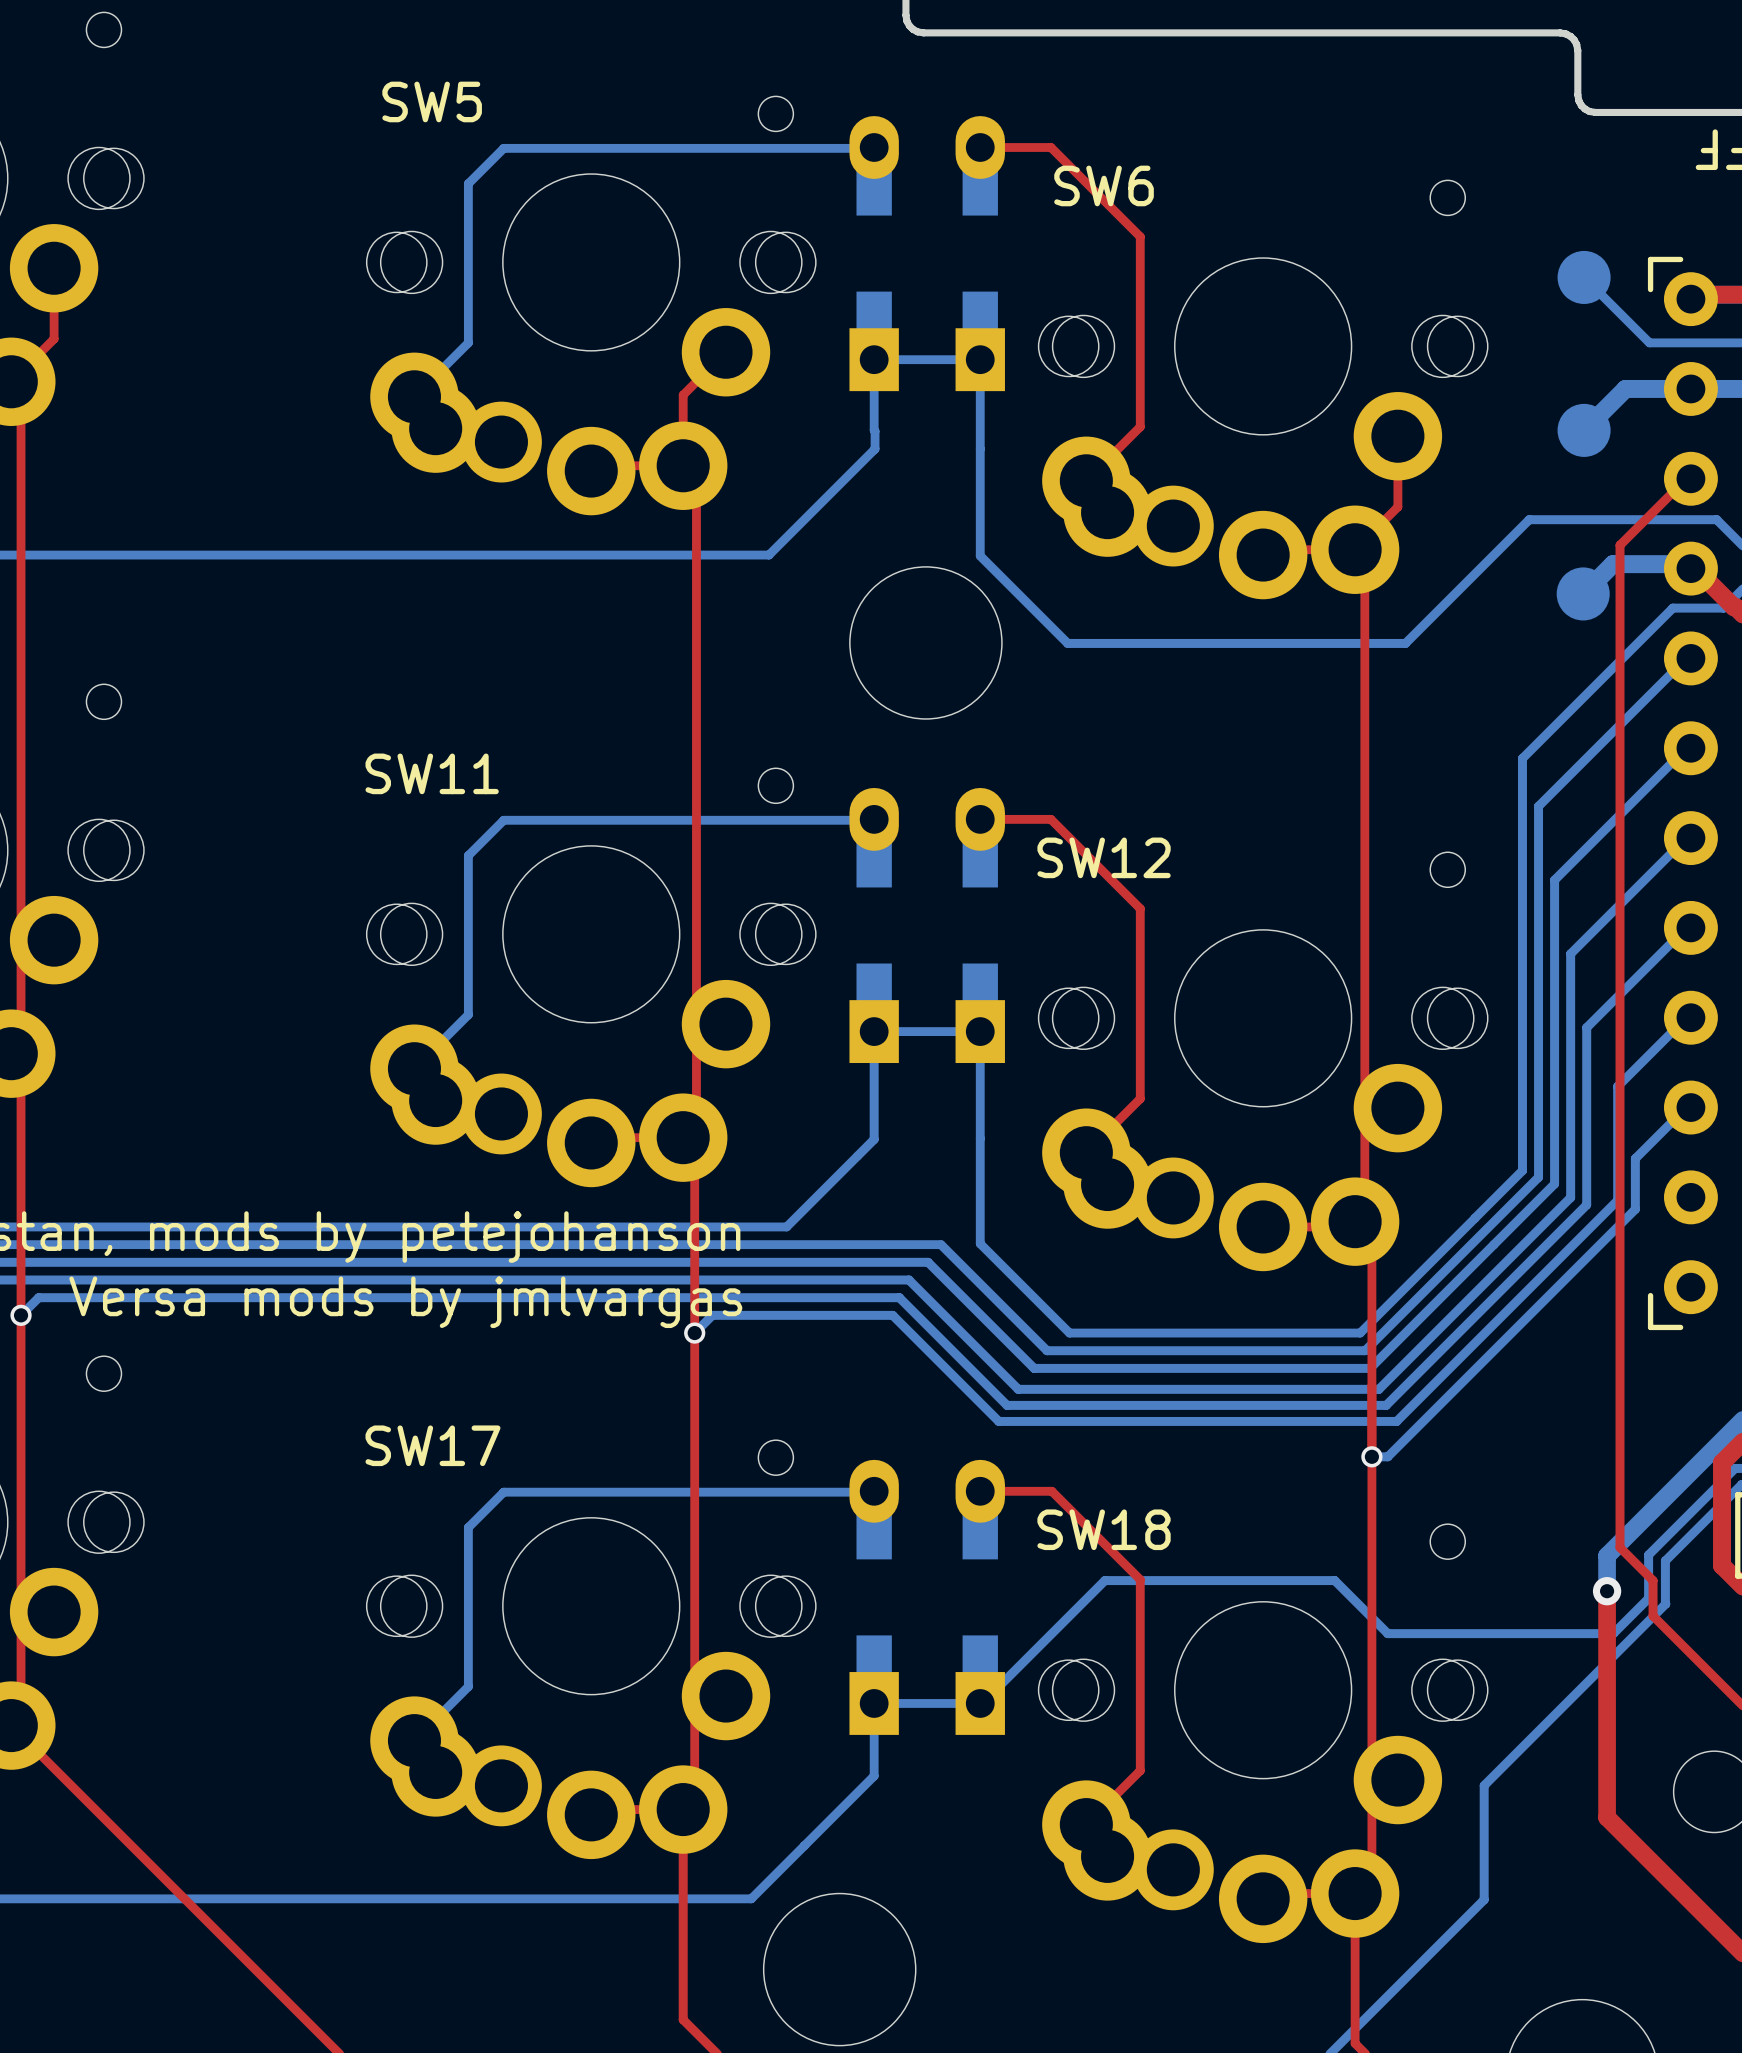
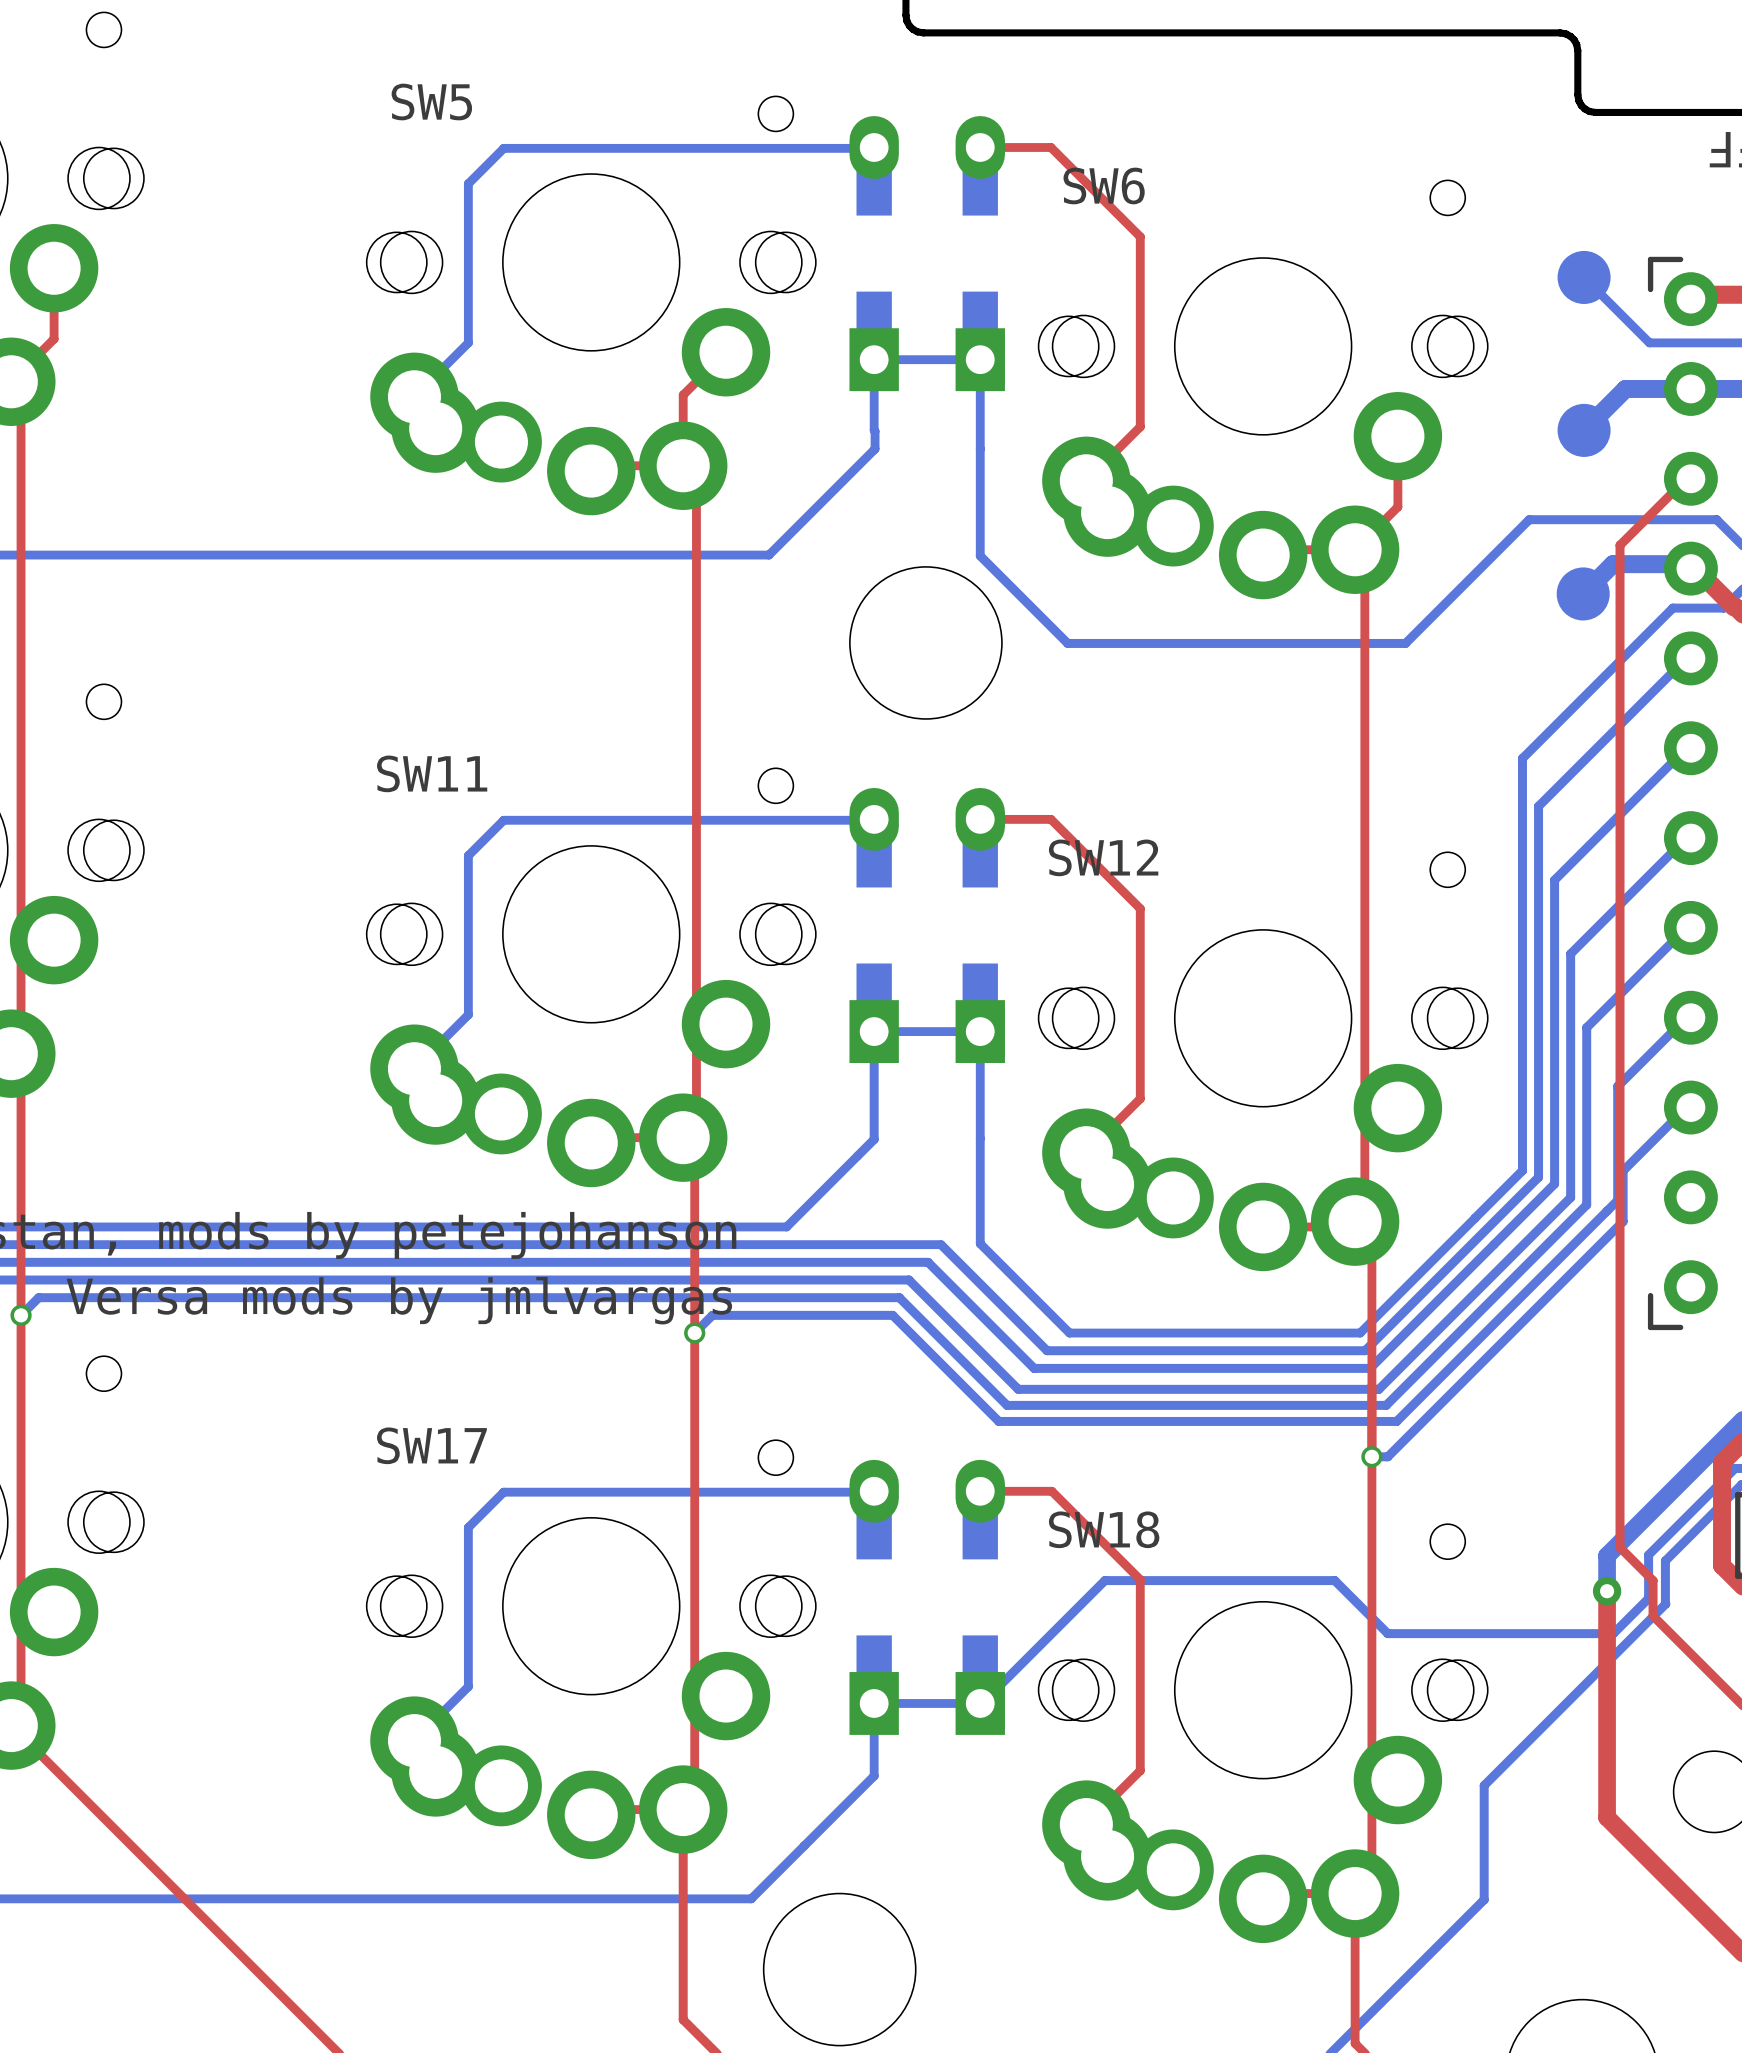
bottom track: (1635, 1158) (1635, 1209) (1623, 1221) -> (1635, 1158) (1623, 1170) (1623, 1221)

